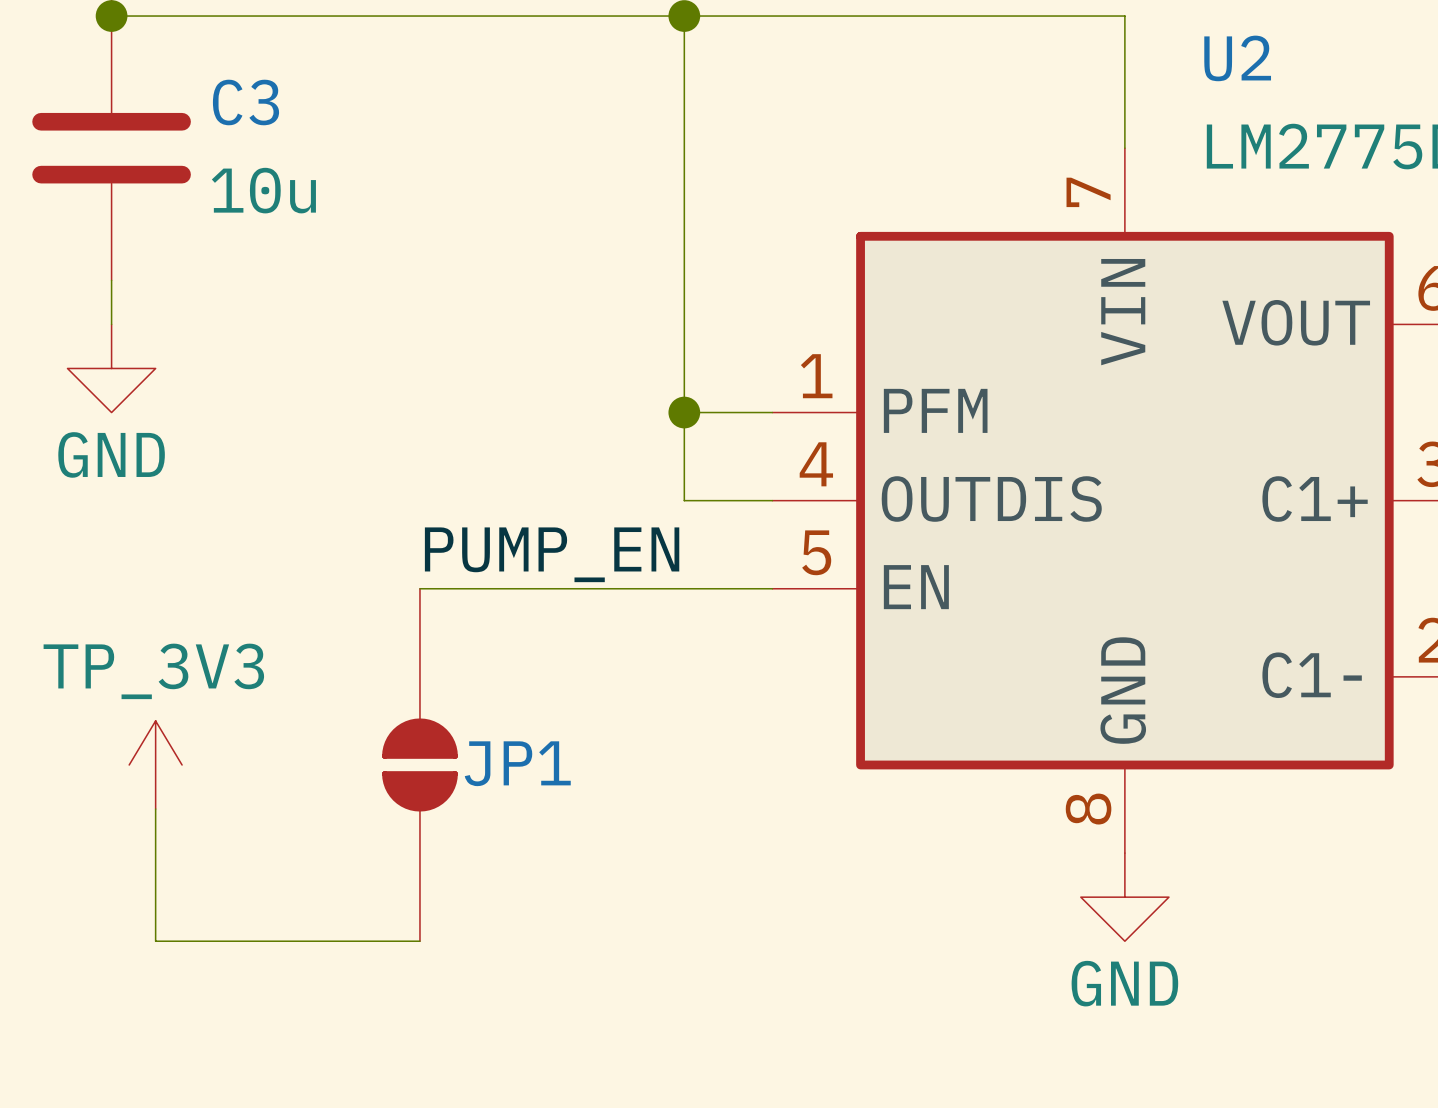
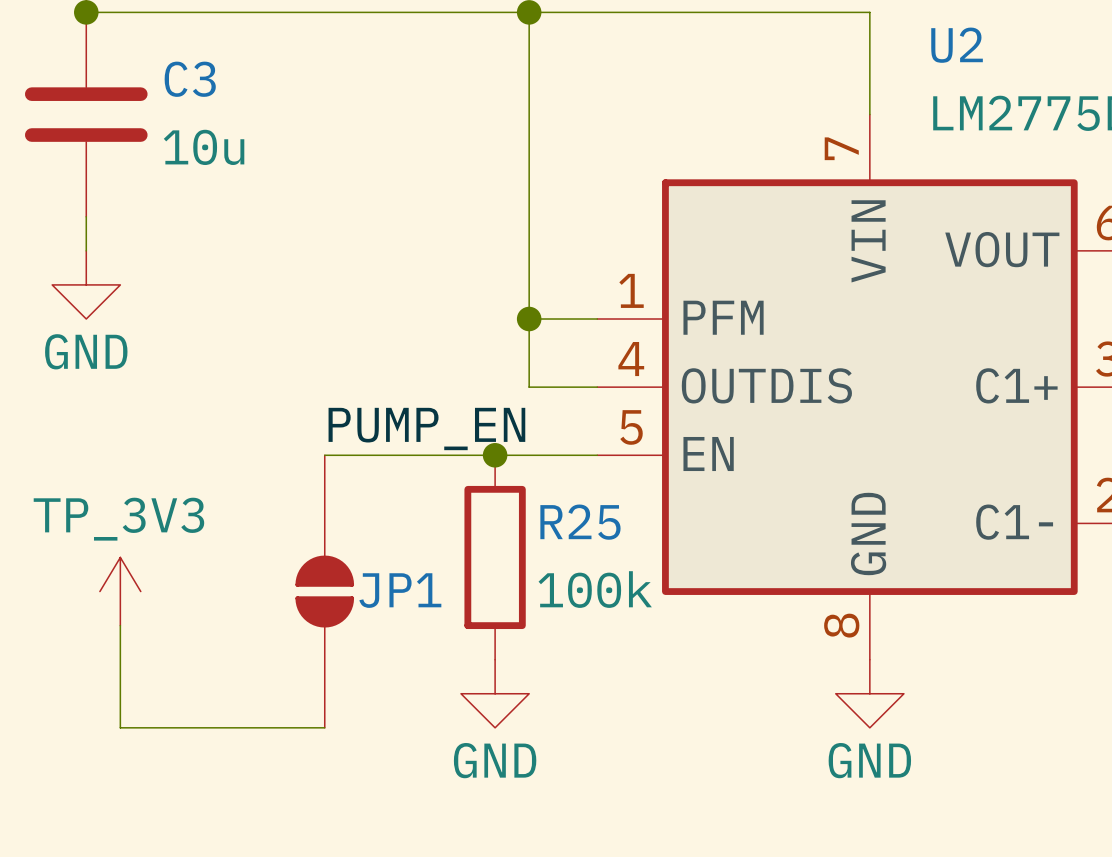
junction: none -> (495, 455)
R25: none -> 100k (495, 557)
power symbol: none -> GND (495, 693)

